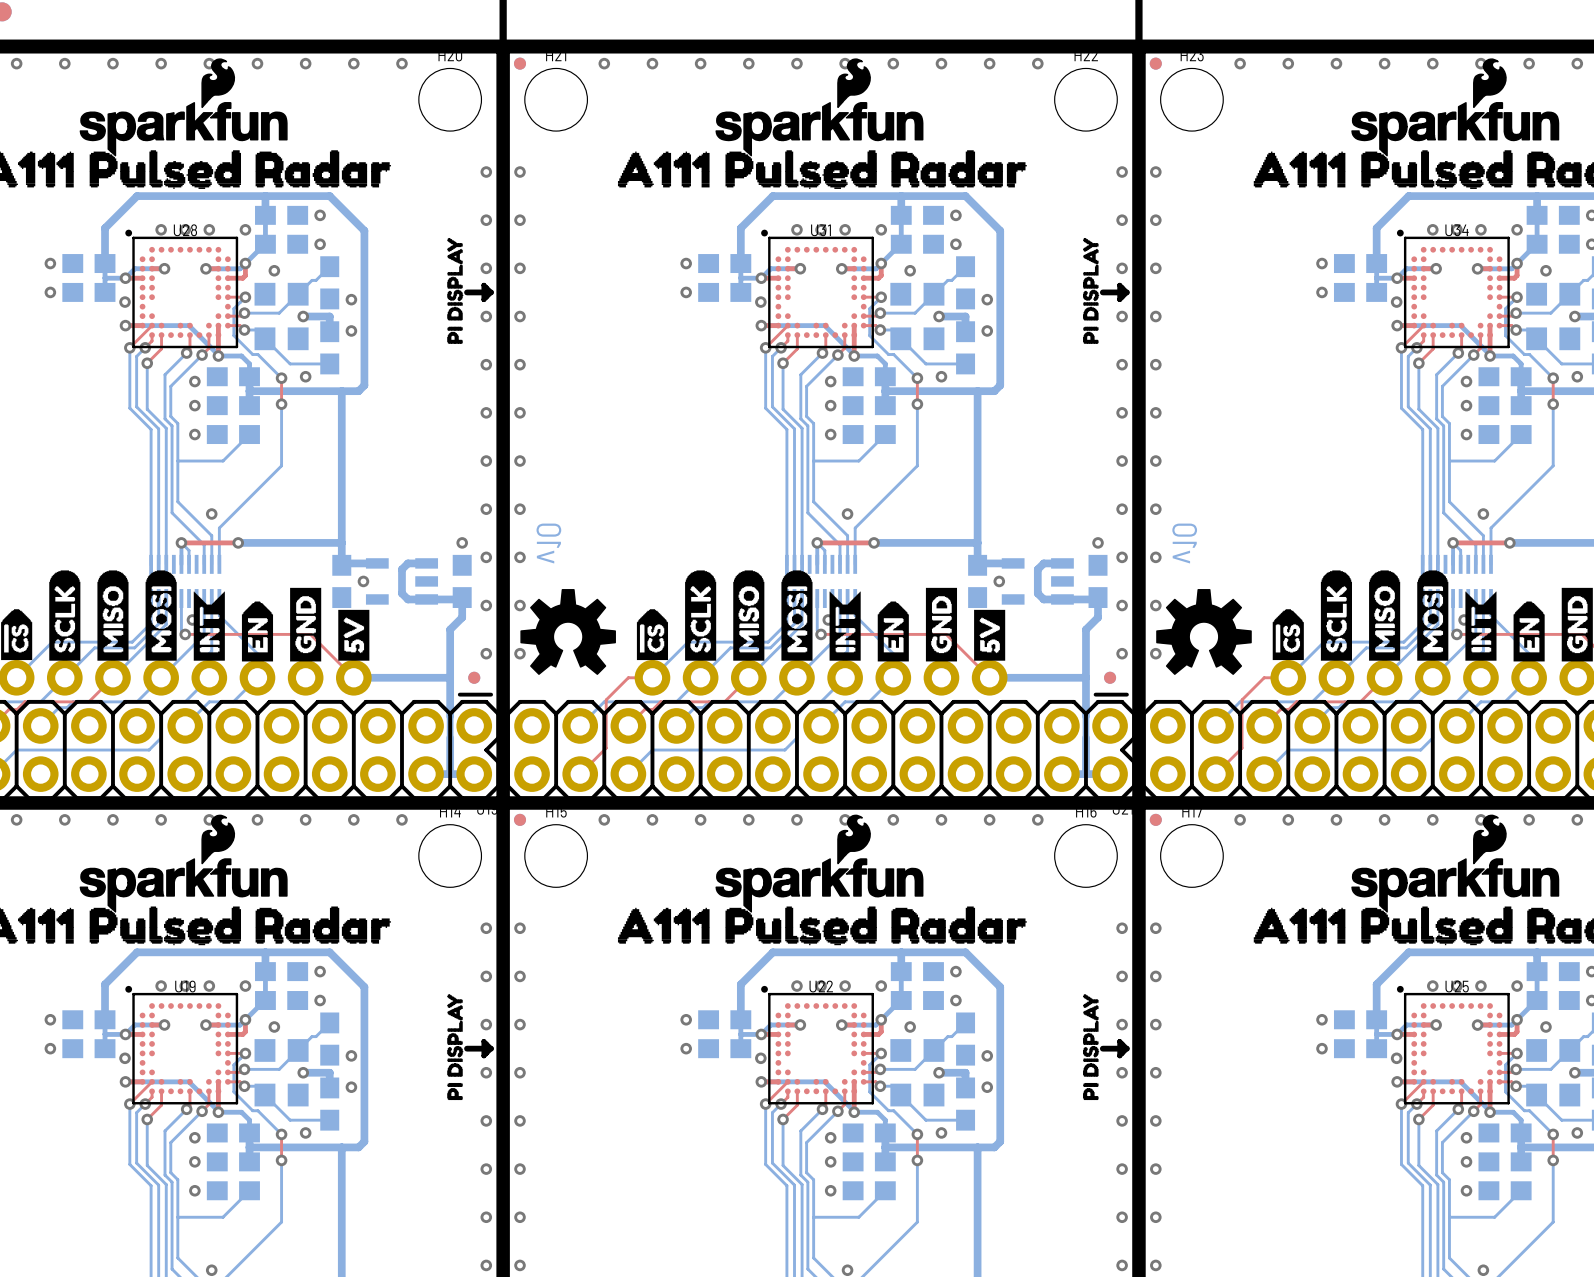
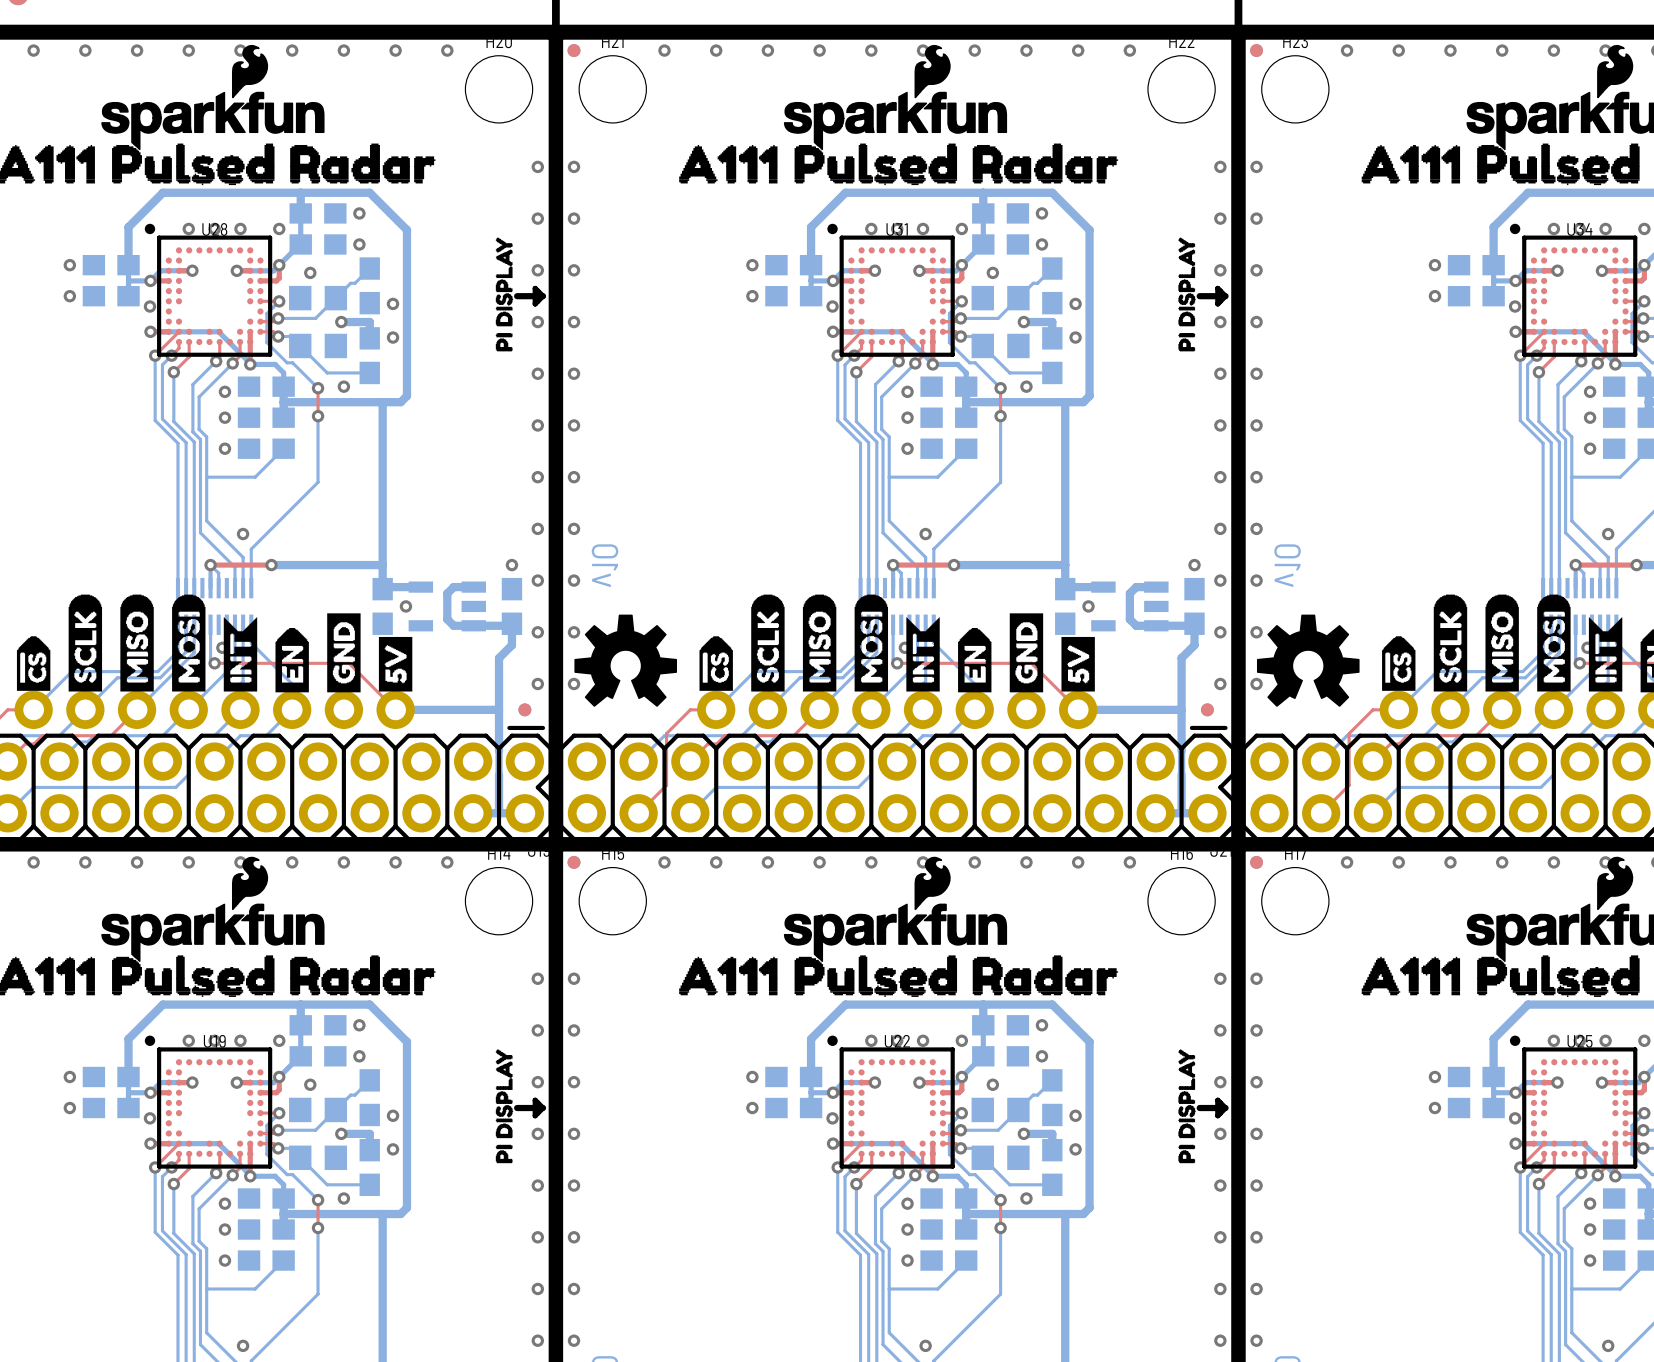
U28 footprint: [125, 229, 239, 349] -> [144, 223, 273, 357]
U31 footprint: [761, 229, 874, 349] -> [827, 223, 955, 357]
U34 footprint: [1396, 229, 1510, 349] -> [1509, 223, 1638, 357]
U19 footprint: [125, 985, 239, 1105] -> [144, 1035, 273, 1169]
U22 footprint: [761, 985, 874, 1105] -> [827, 1035, 955, 1169]
U25 footprint: [1396, 985, 1510, 1105] -> [1509, 1035, 1638, 1169]

